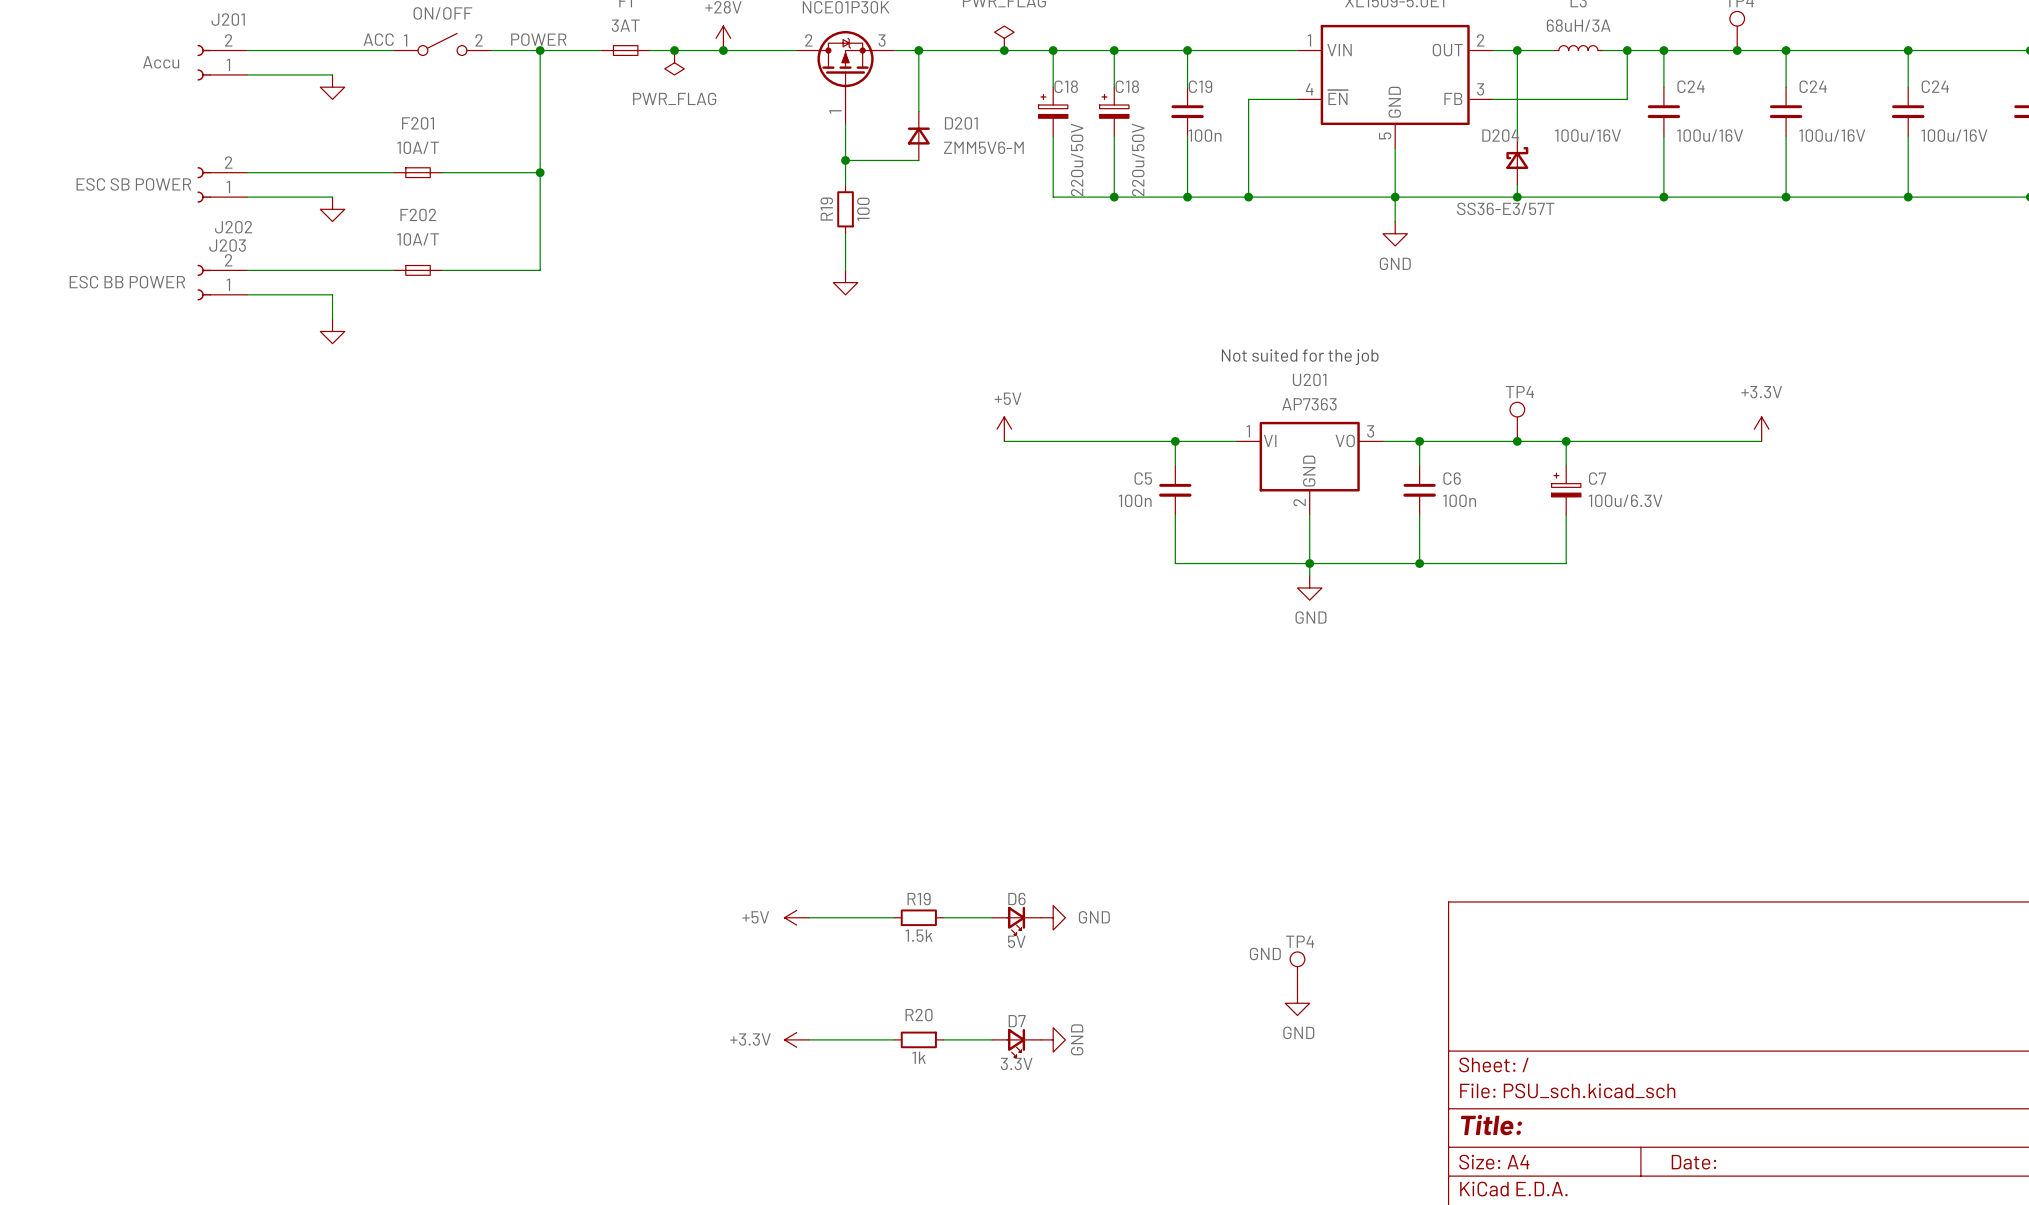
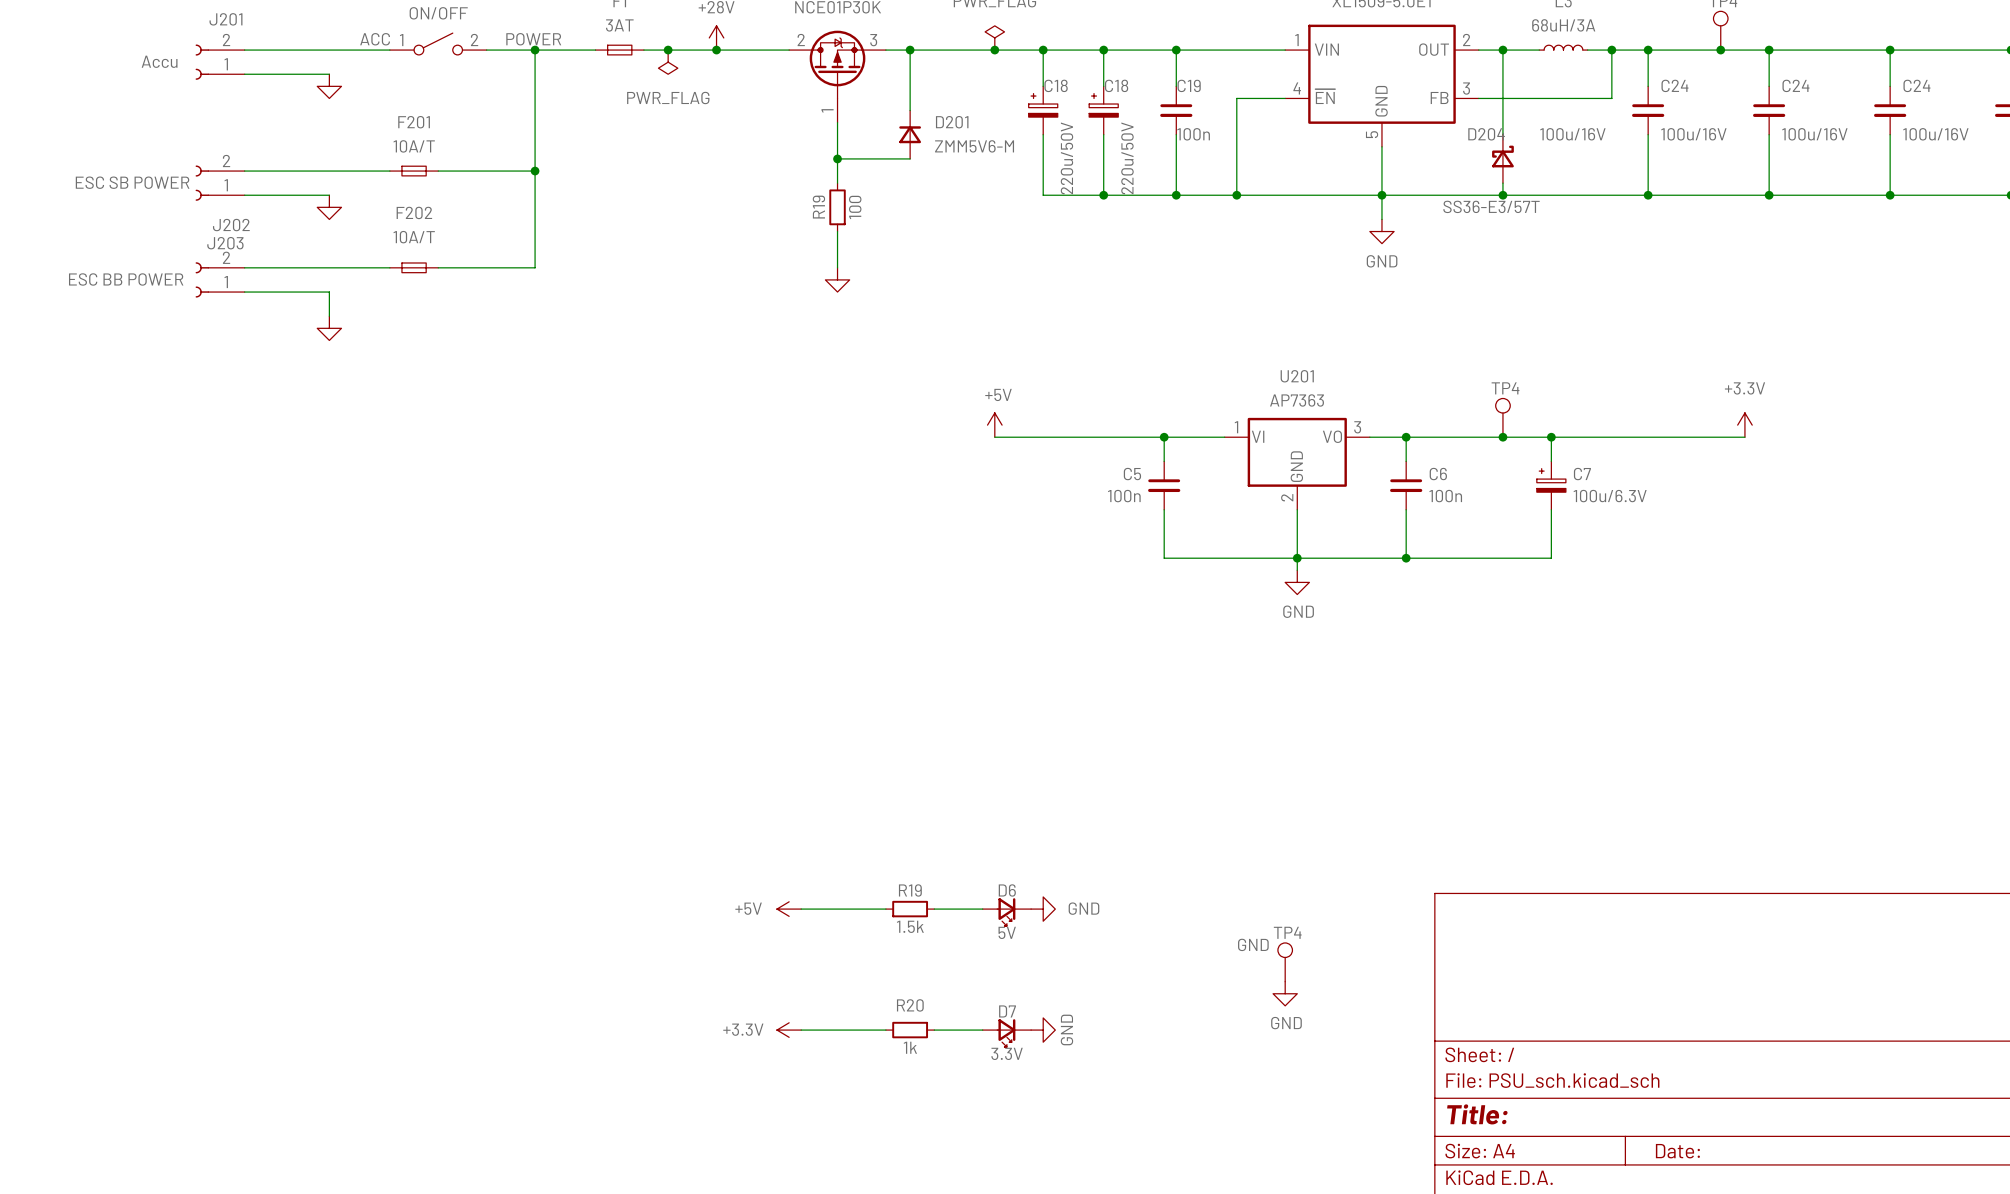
text: Not suited for the job (1300, 357) -> none

